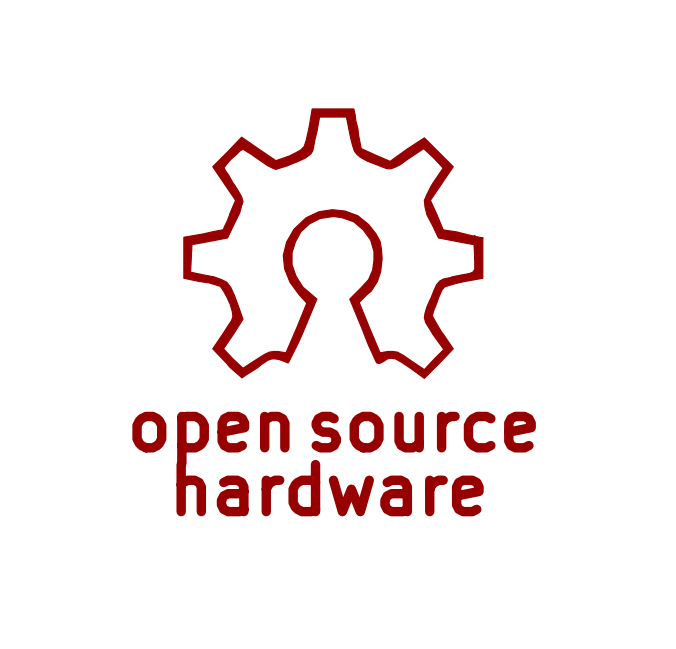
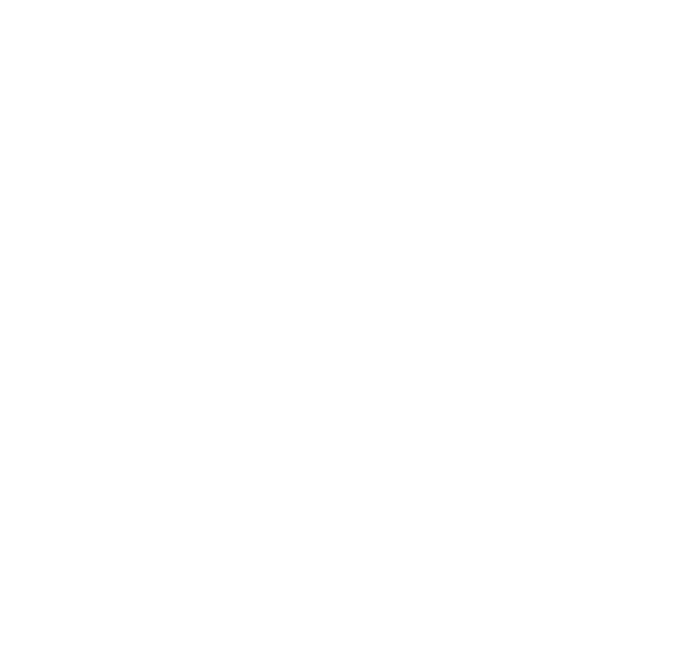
power symbol: (333, 243) -> none

